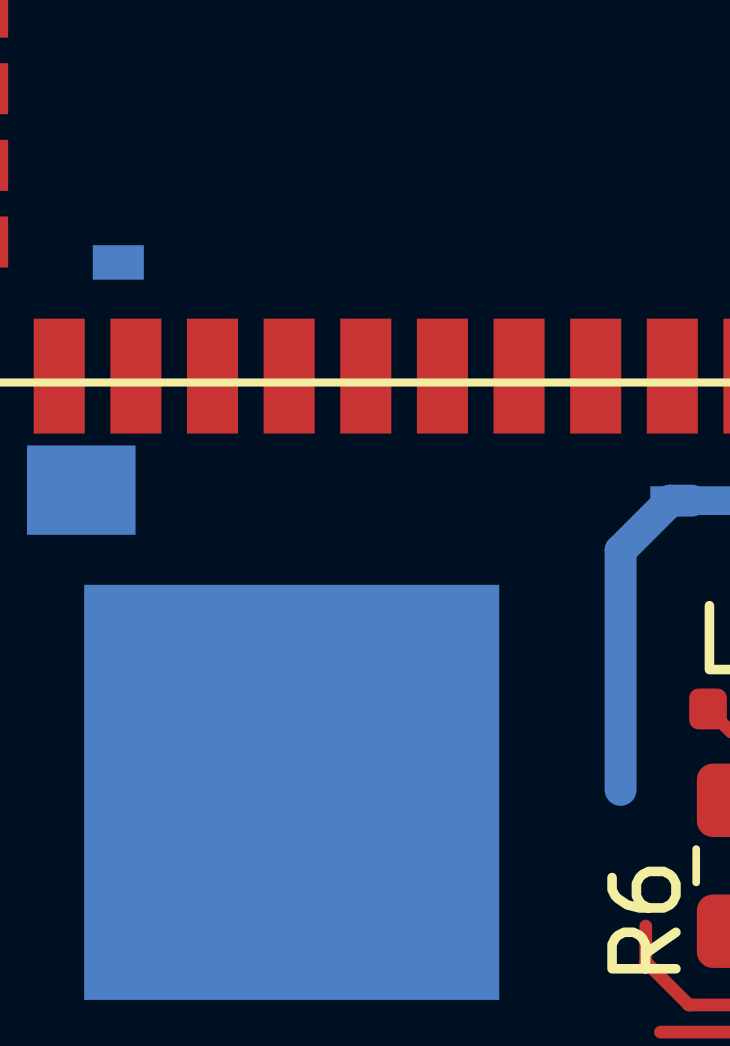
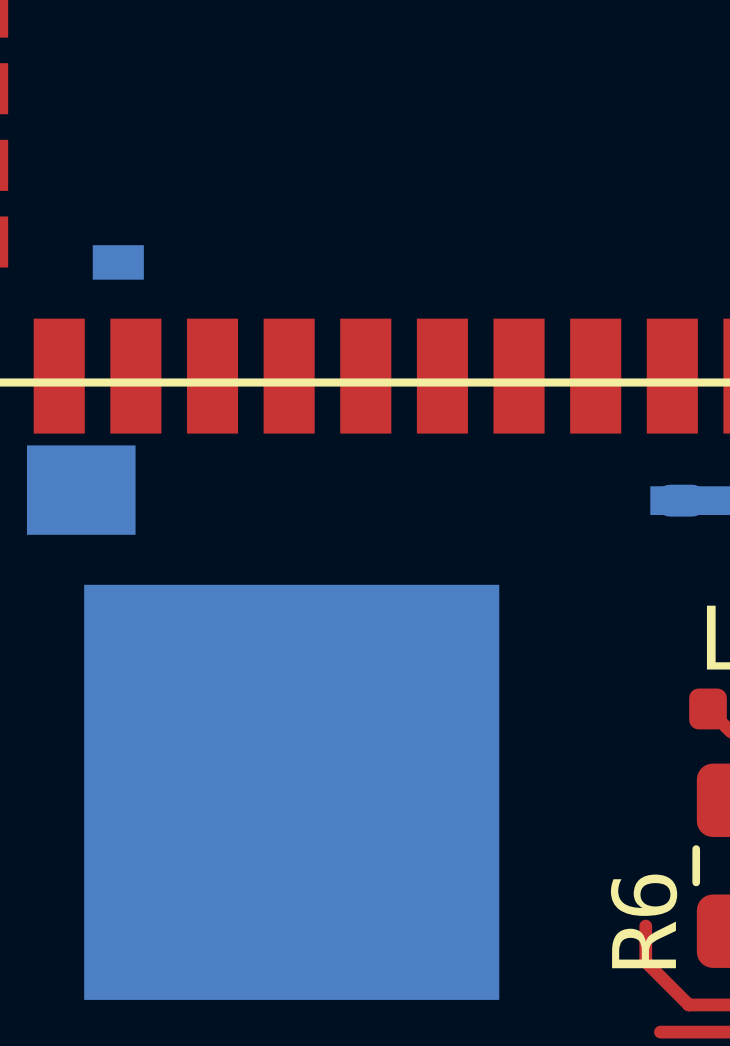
bottom track: (670, 500) (620, 550) (620, 789) -> none

